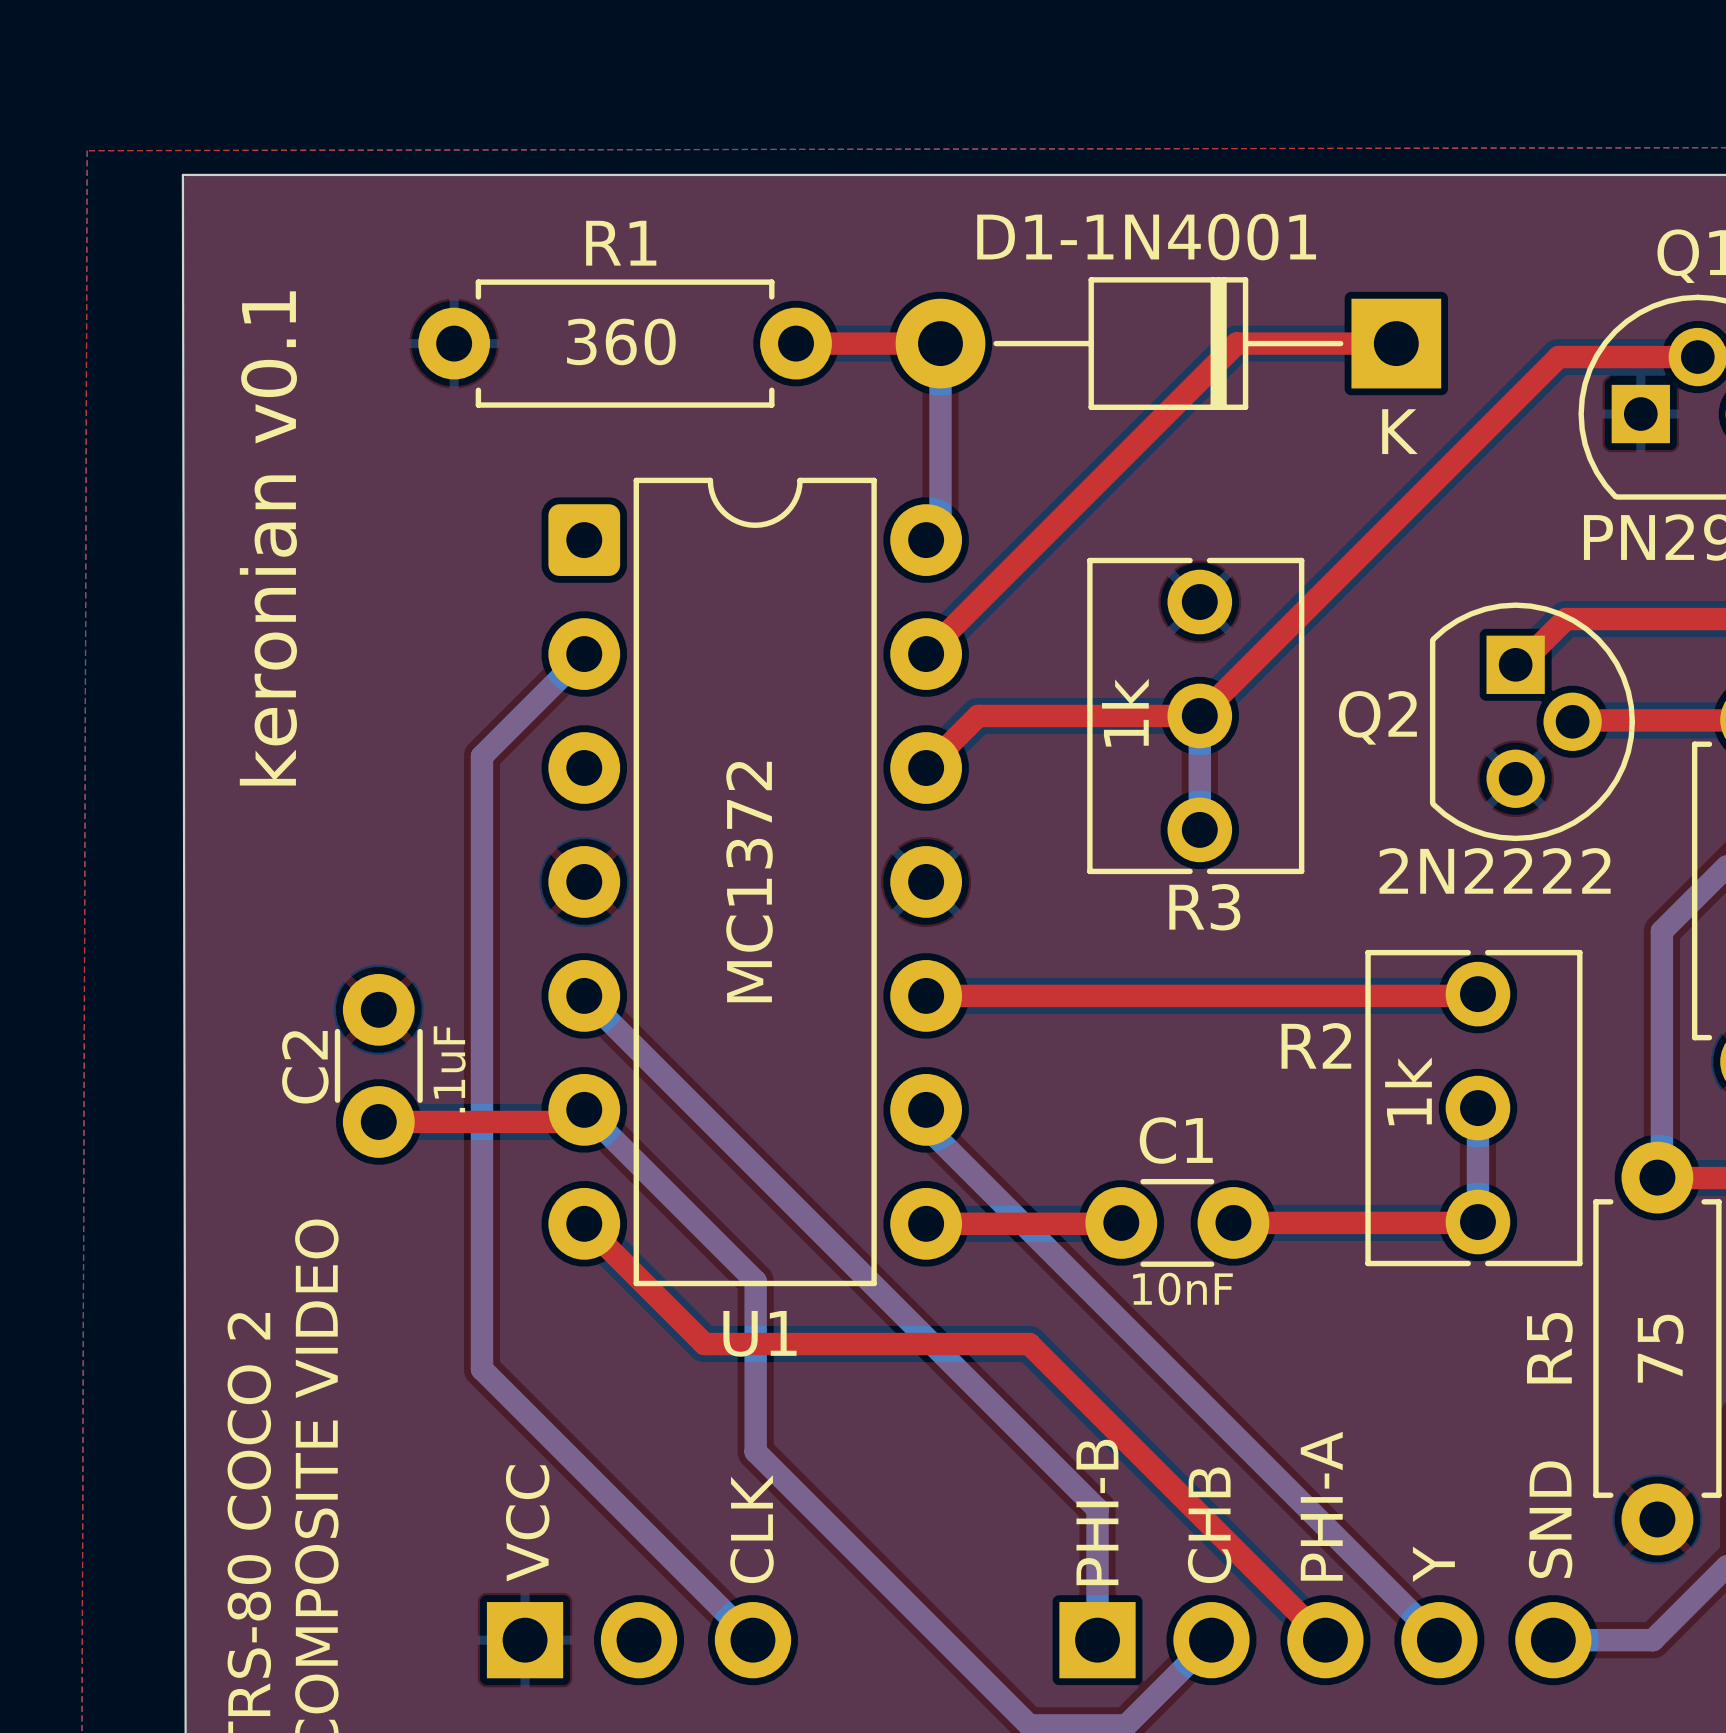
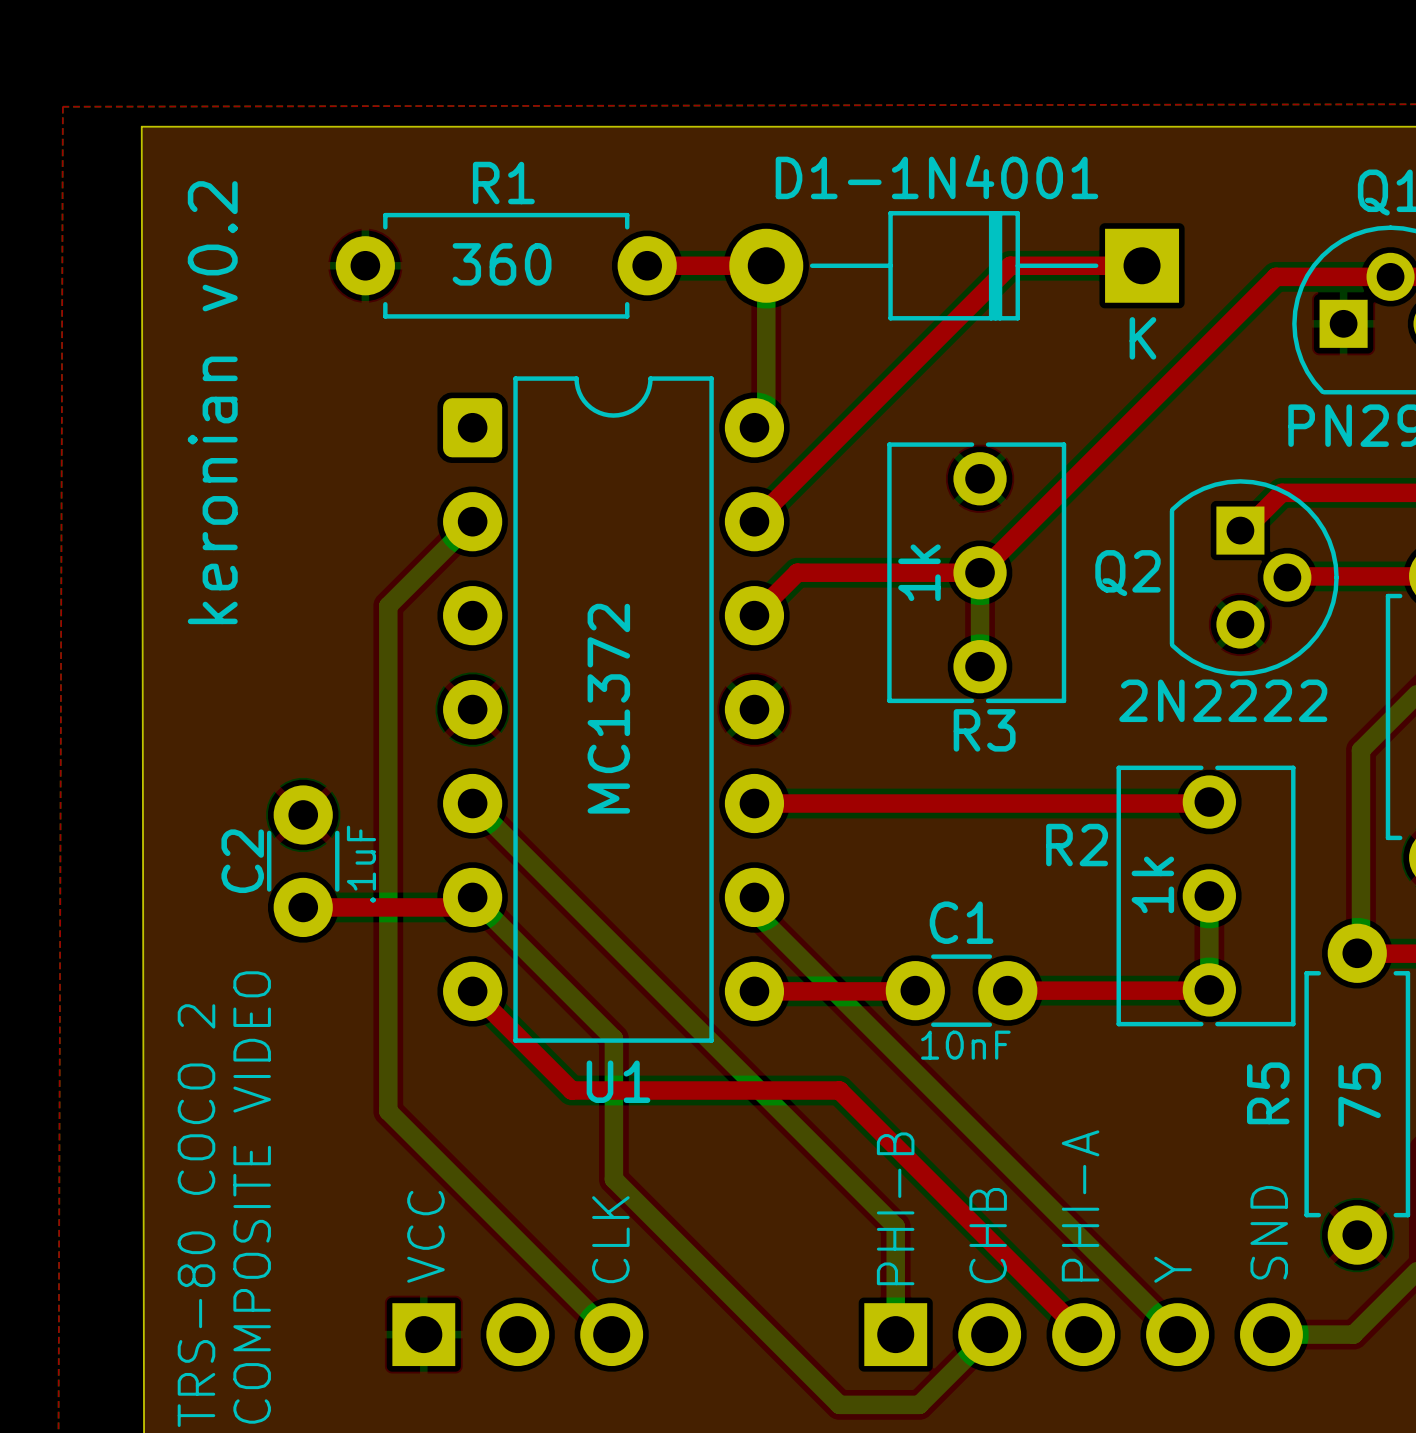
text: keronian v0.1 (268, 538) -> keronian v0.2 (212, 402)

